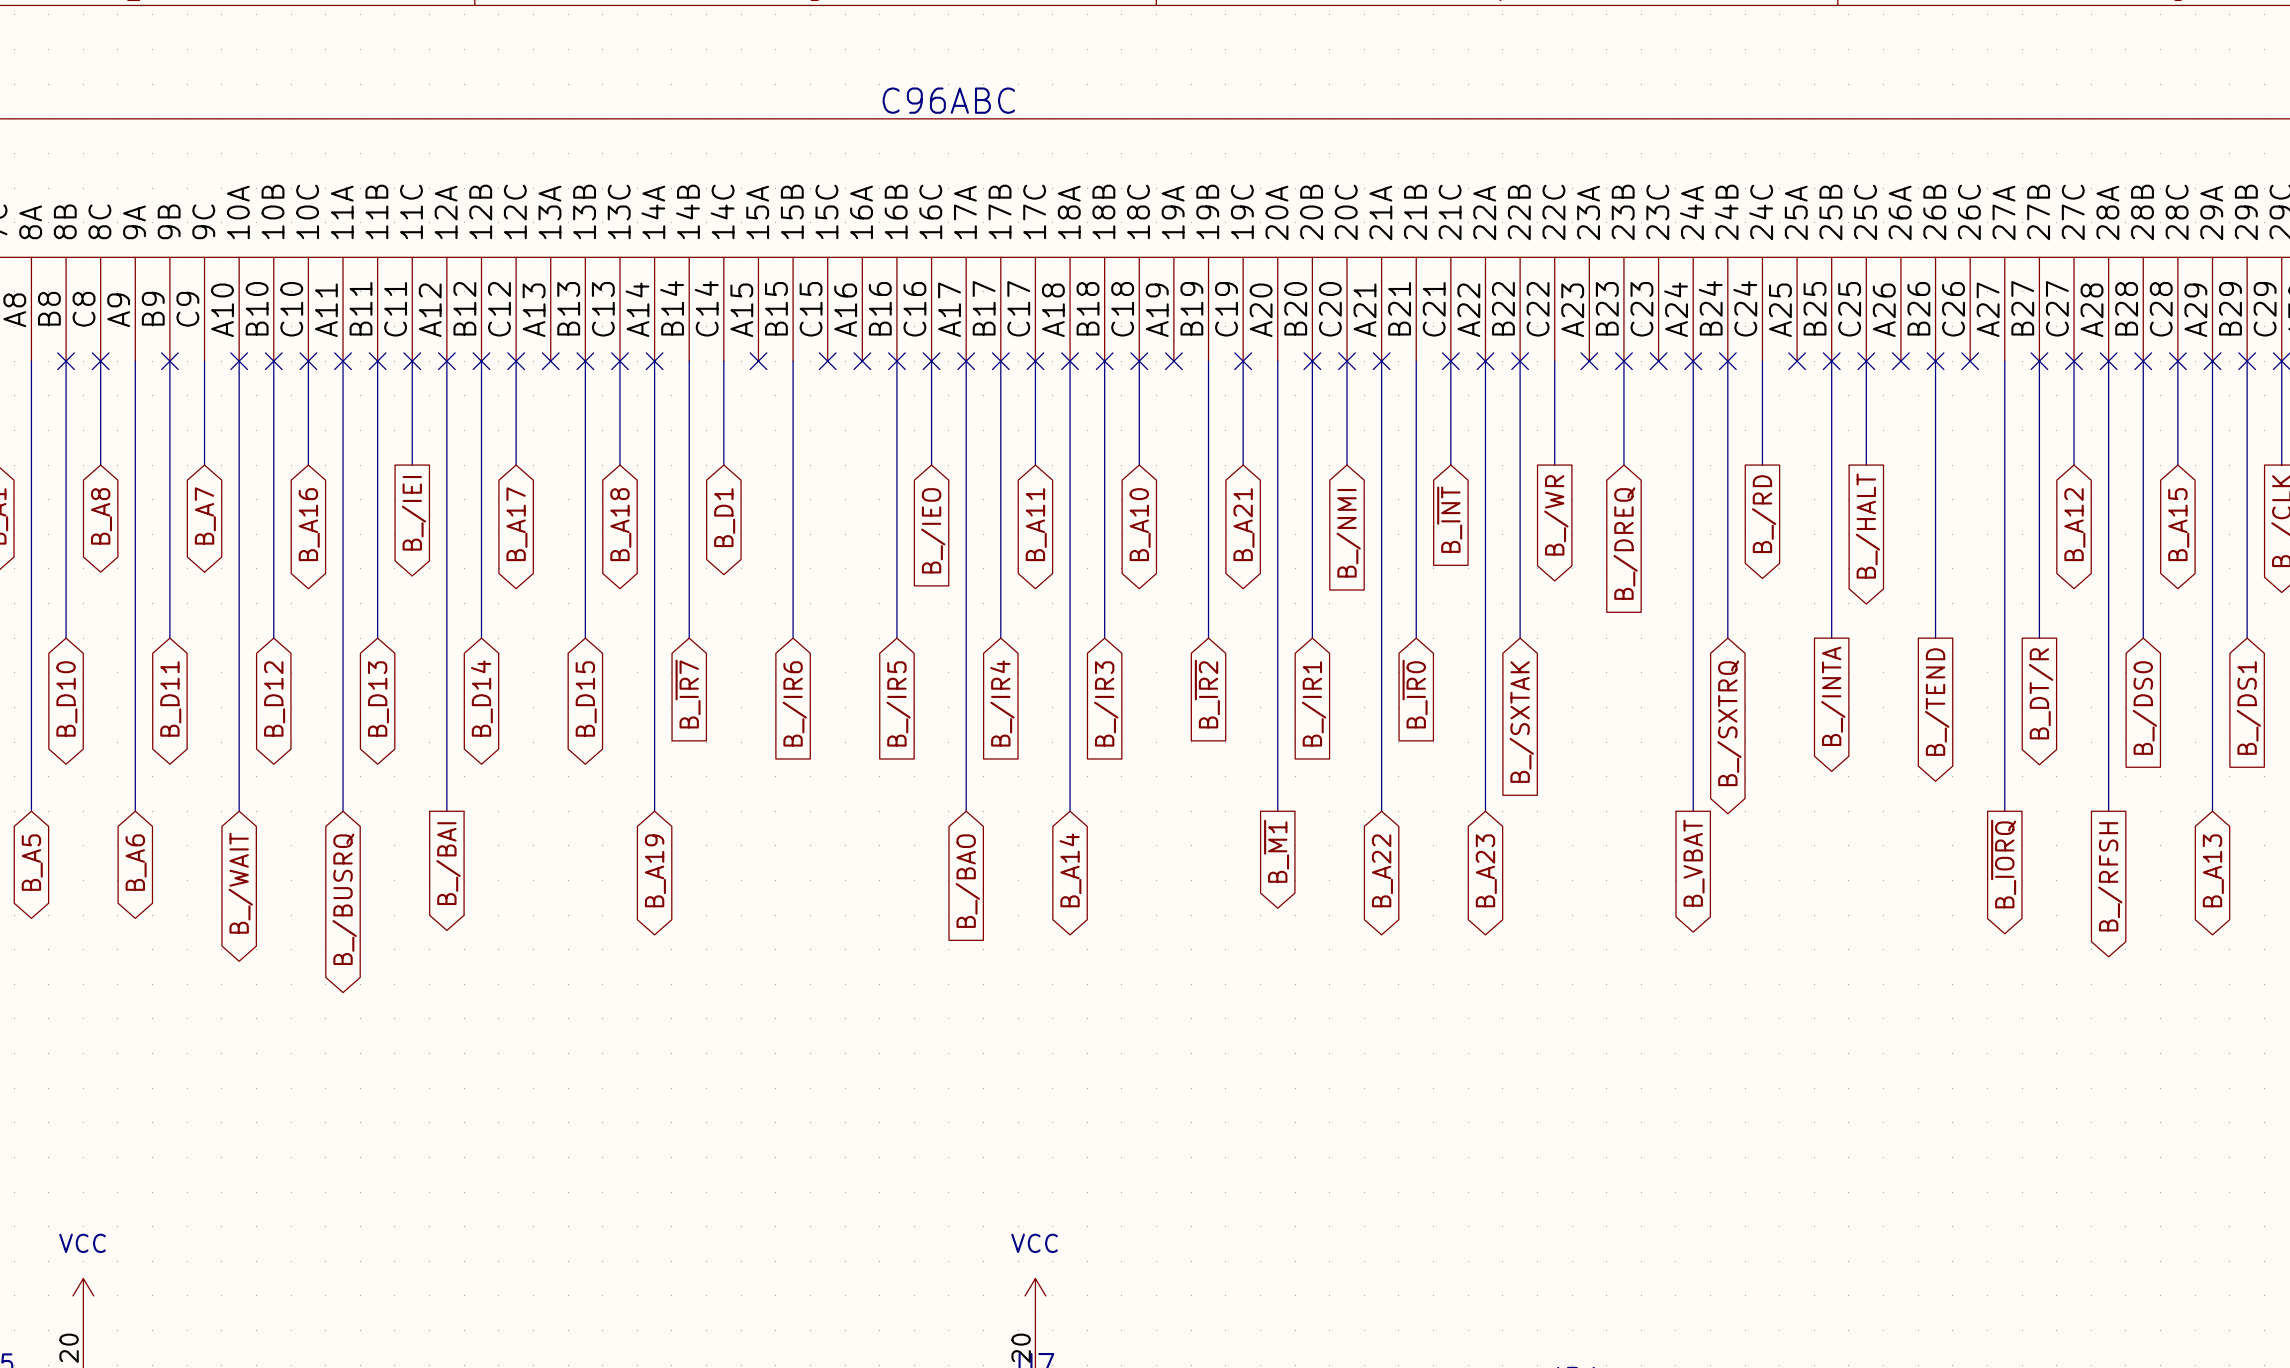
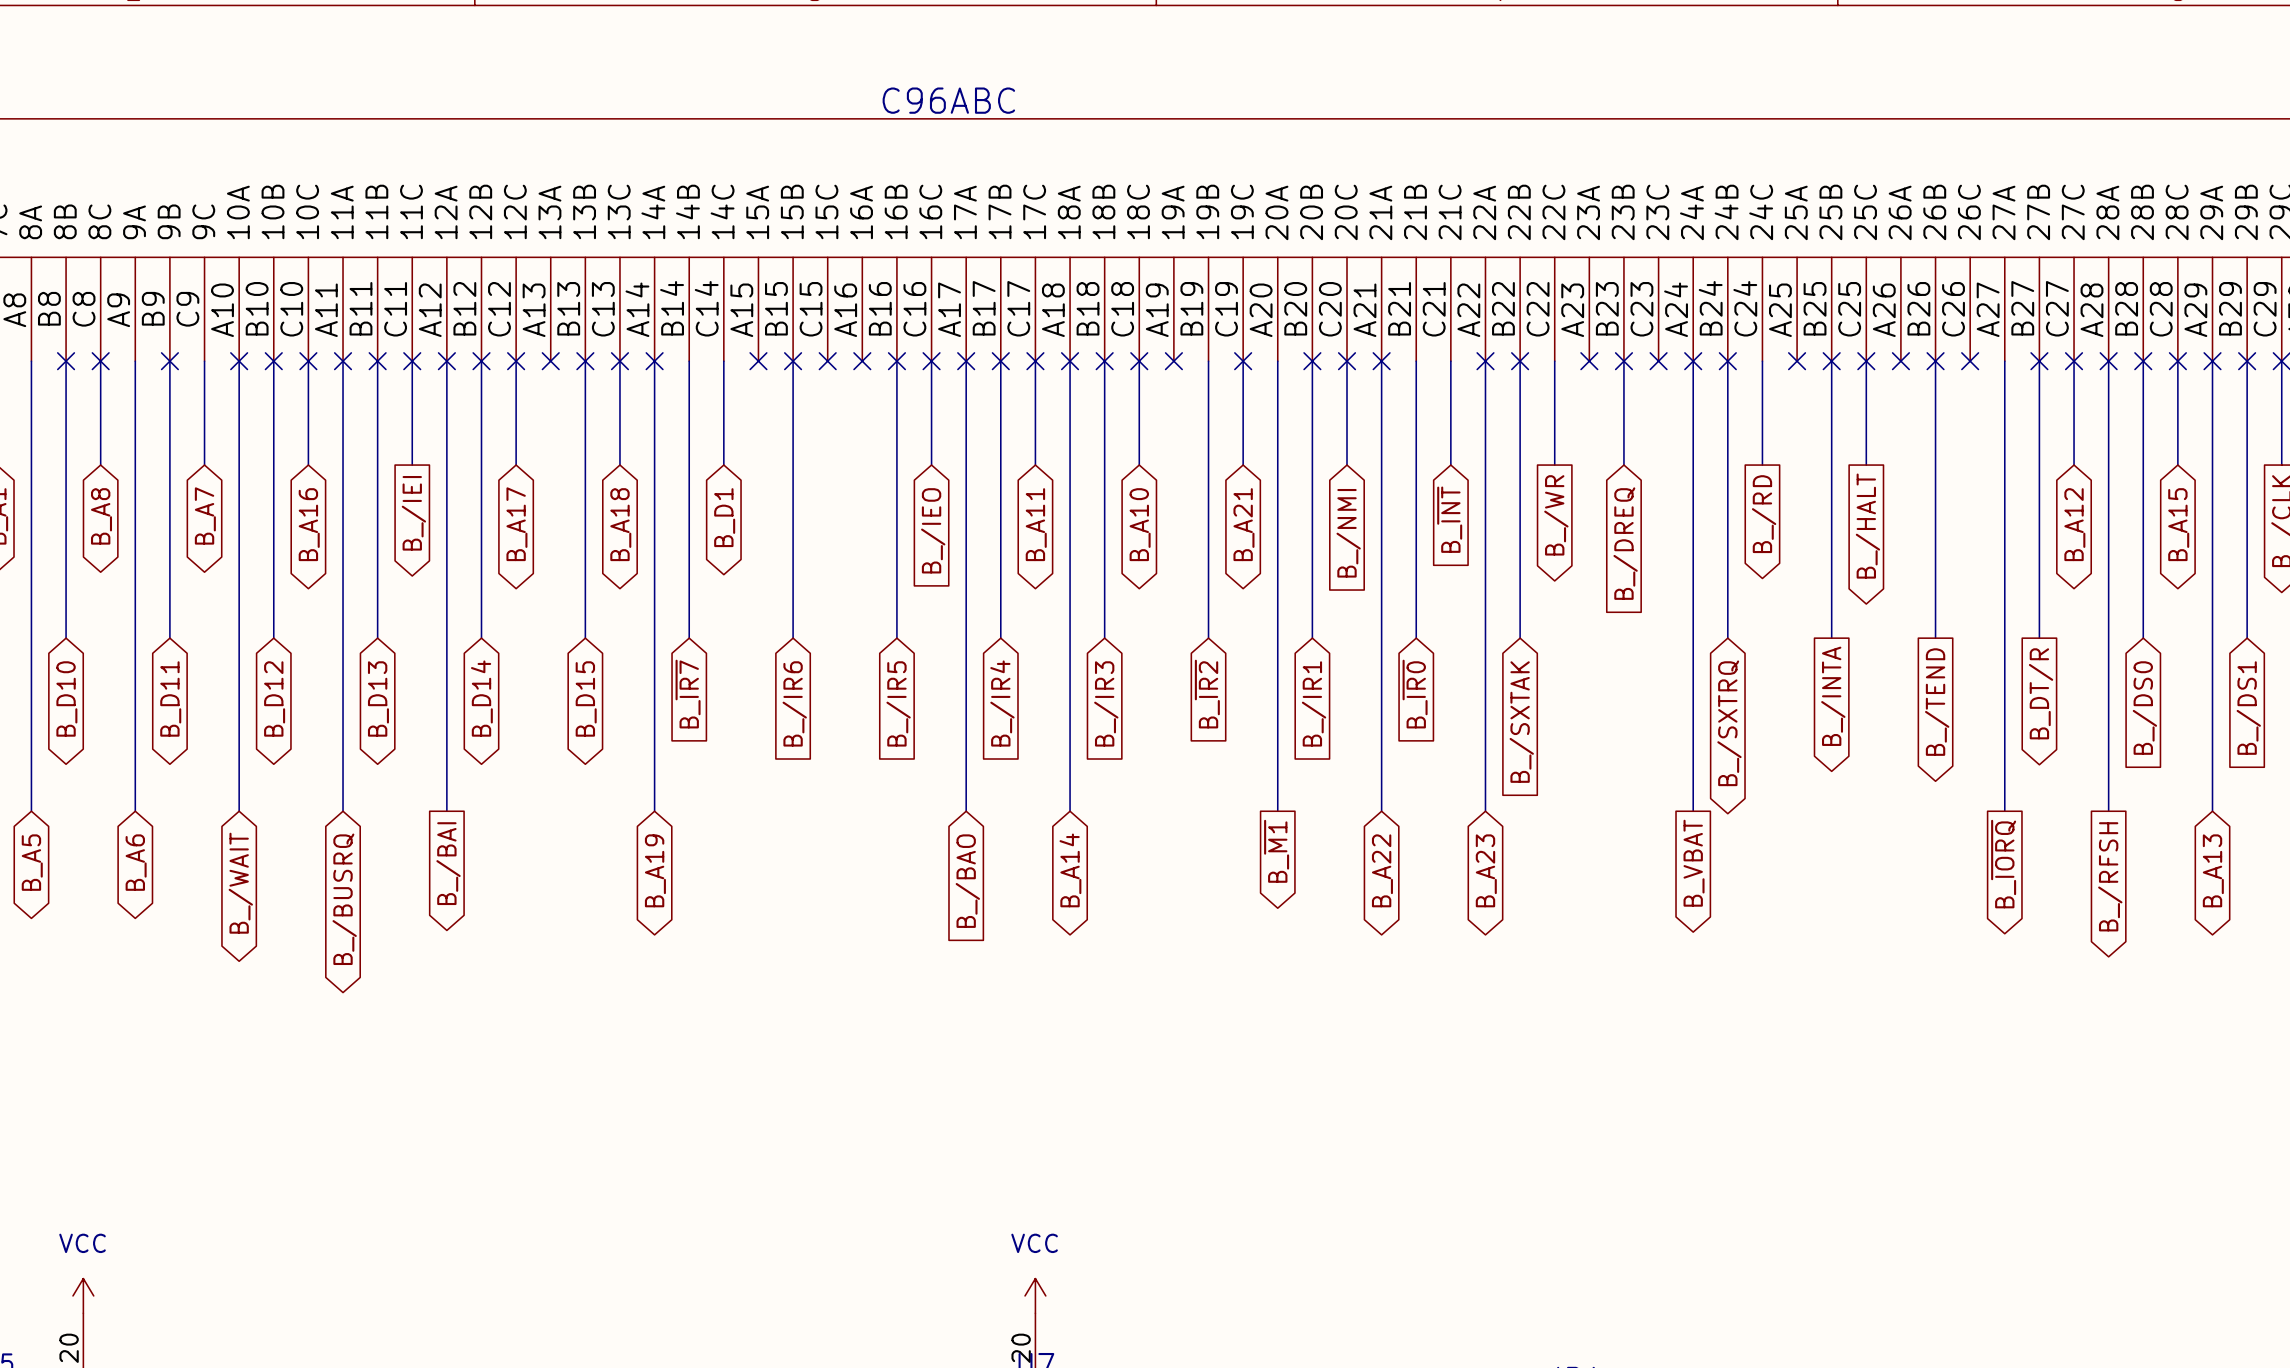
no-connect mark: none -> (793, 361)
no-connect mark: (1450, 361) -> none

